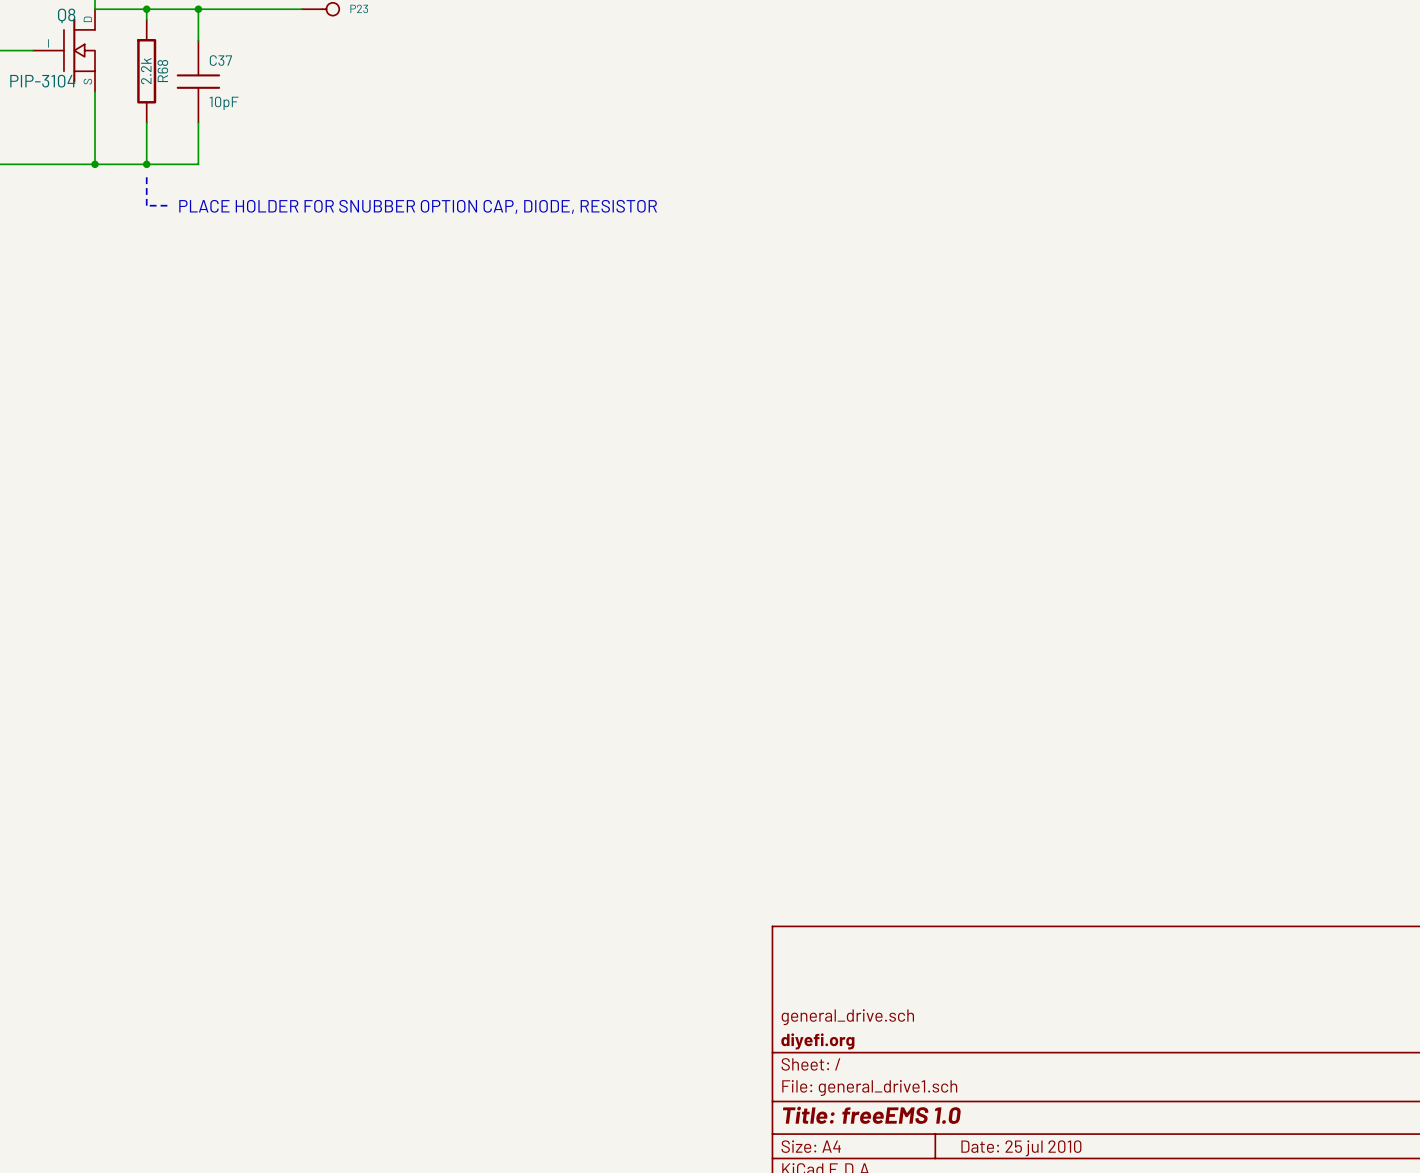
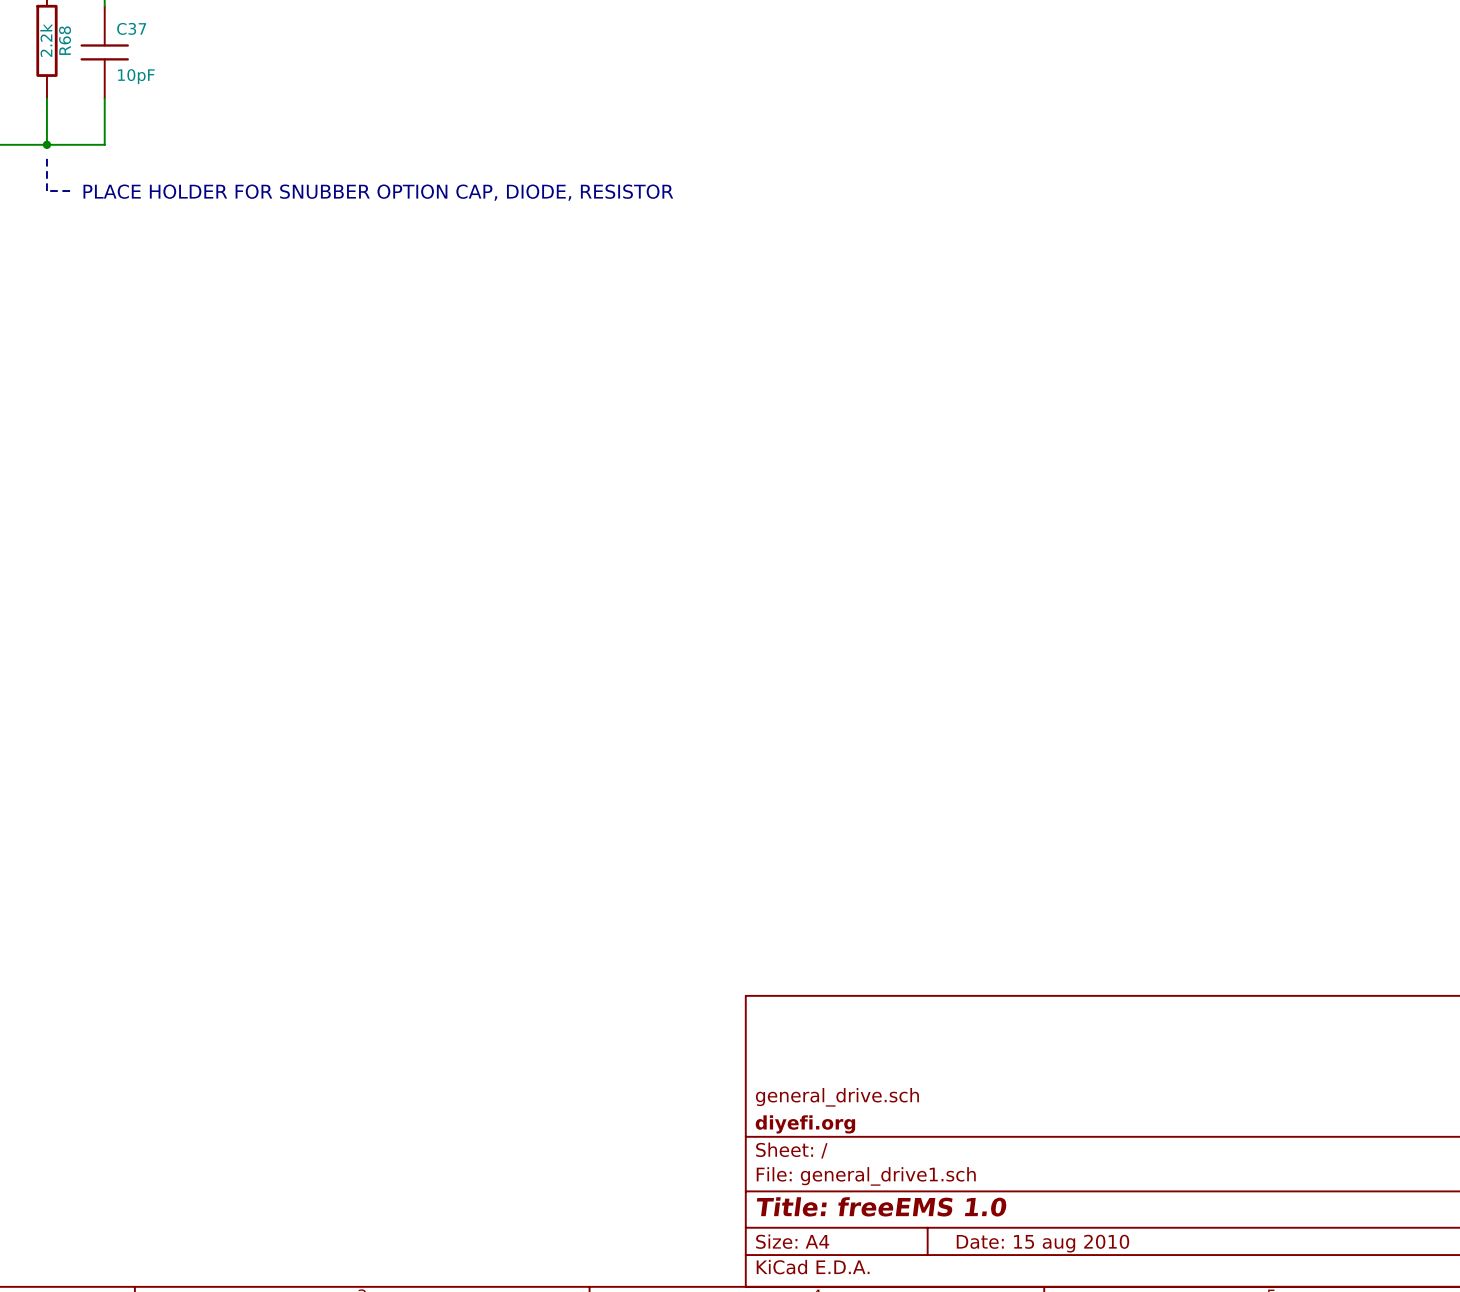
title block: Date: 25 jul 2010 (1021, 1148) -> Date: 15 aug 2010 (1042, 1243)

